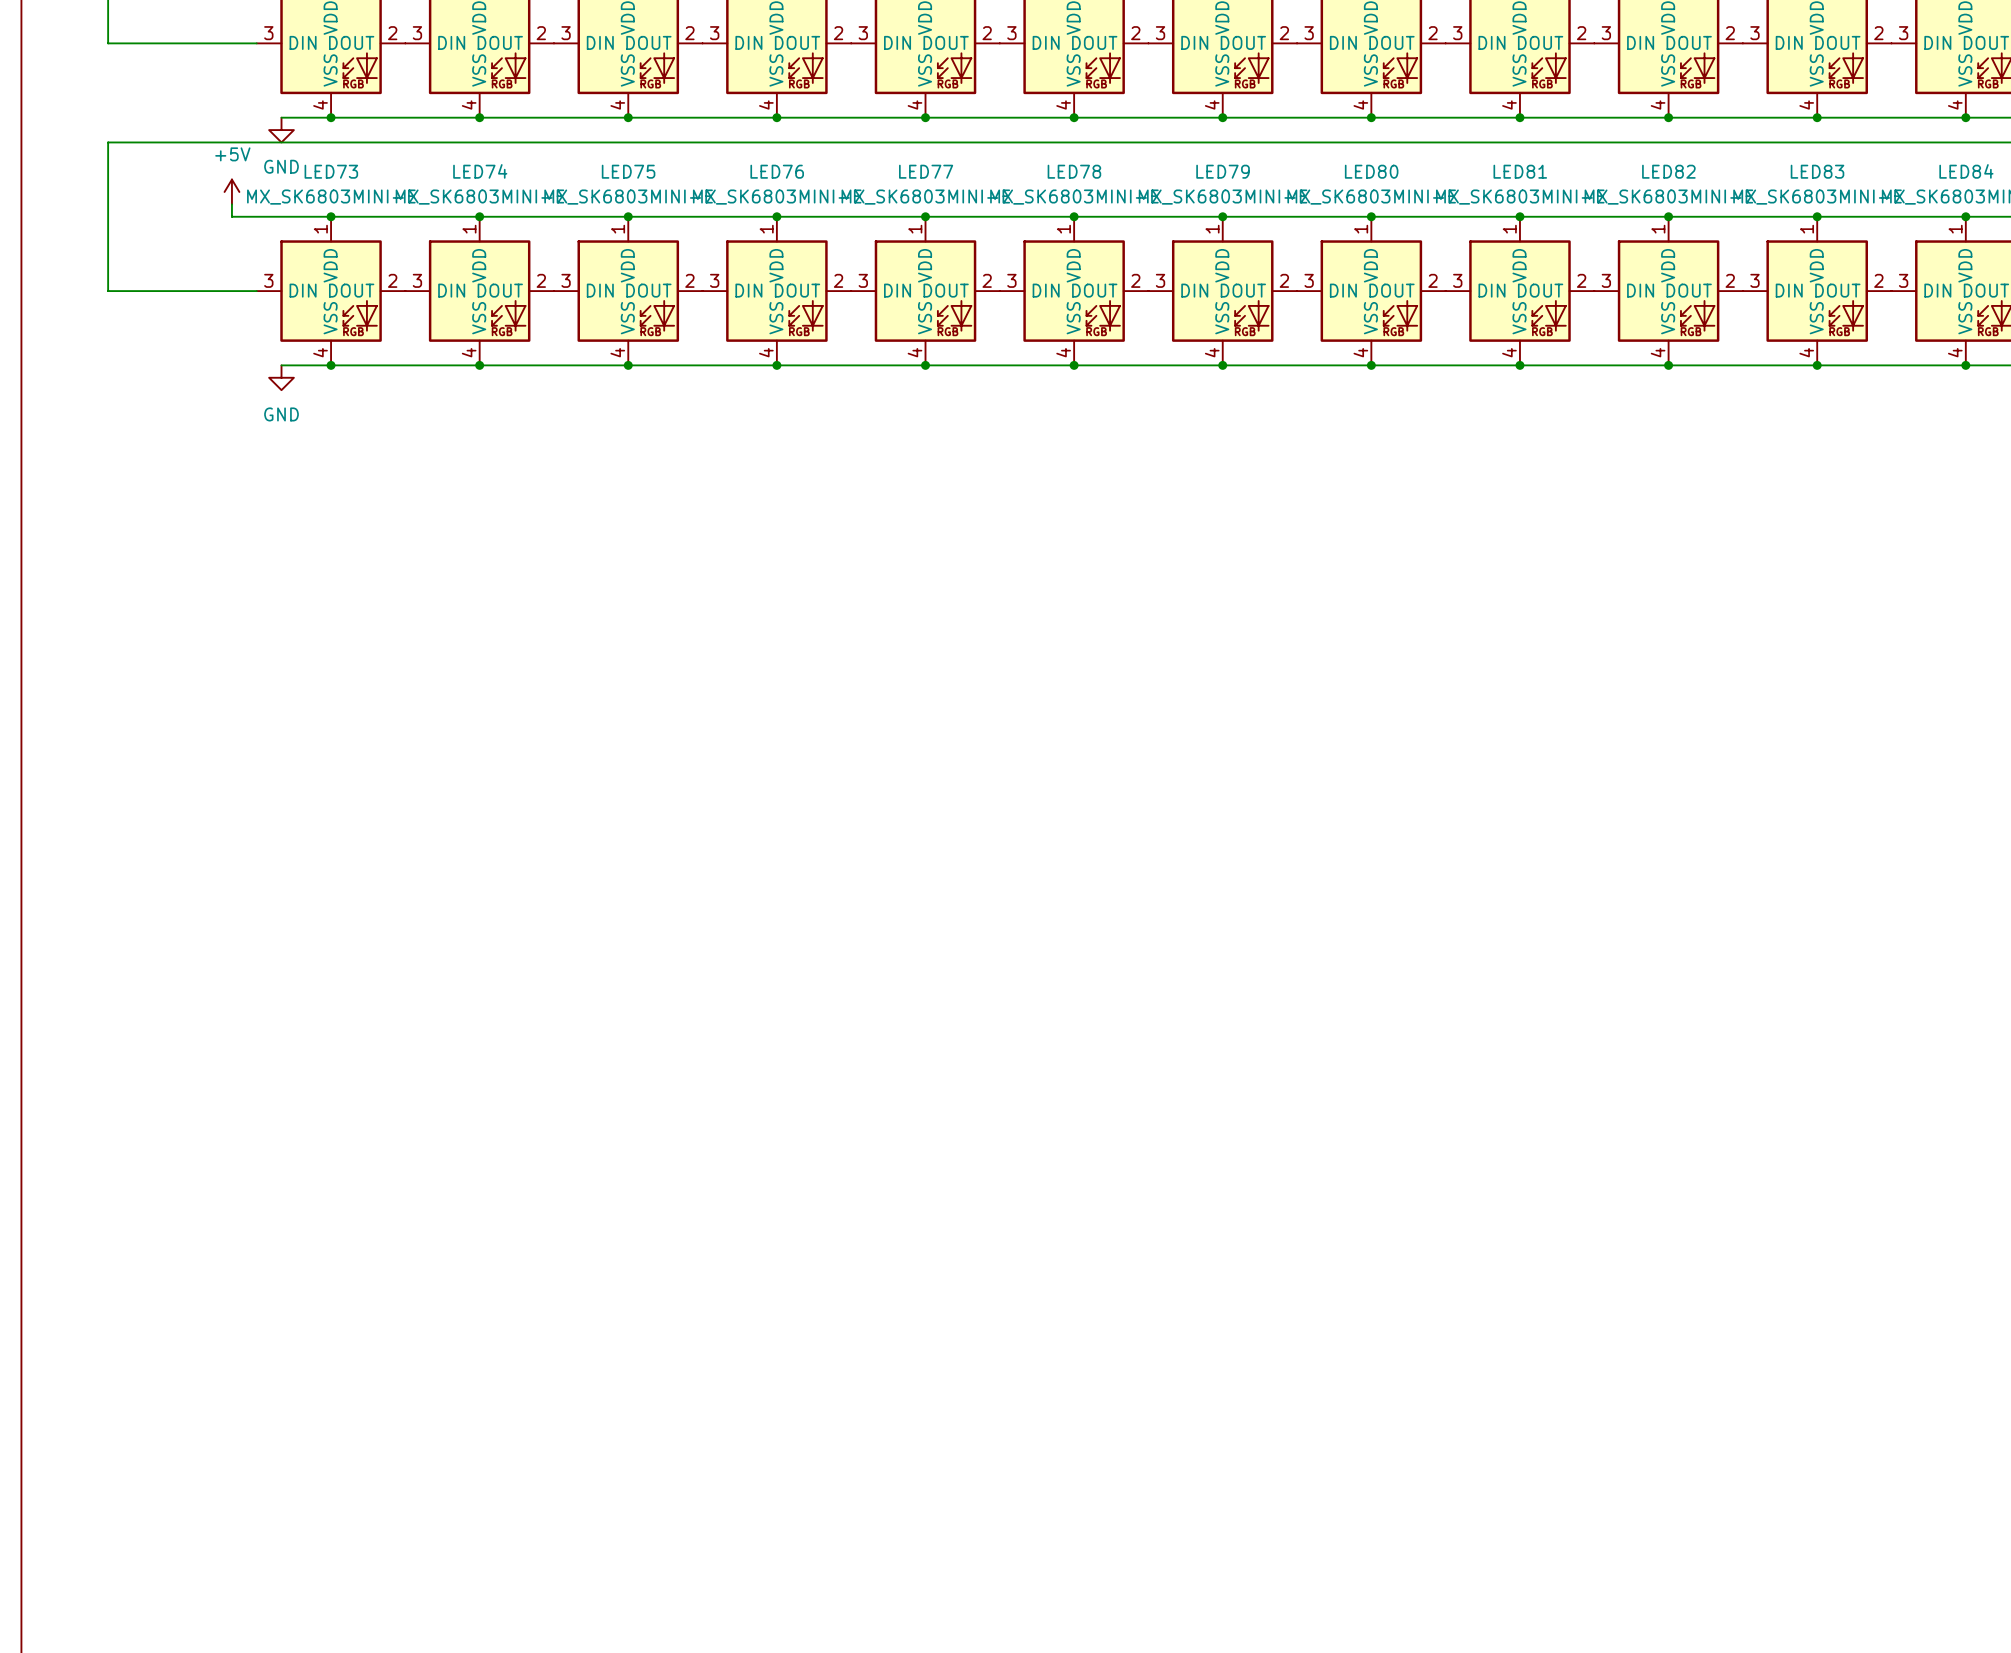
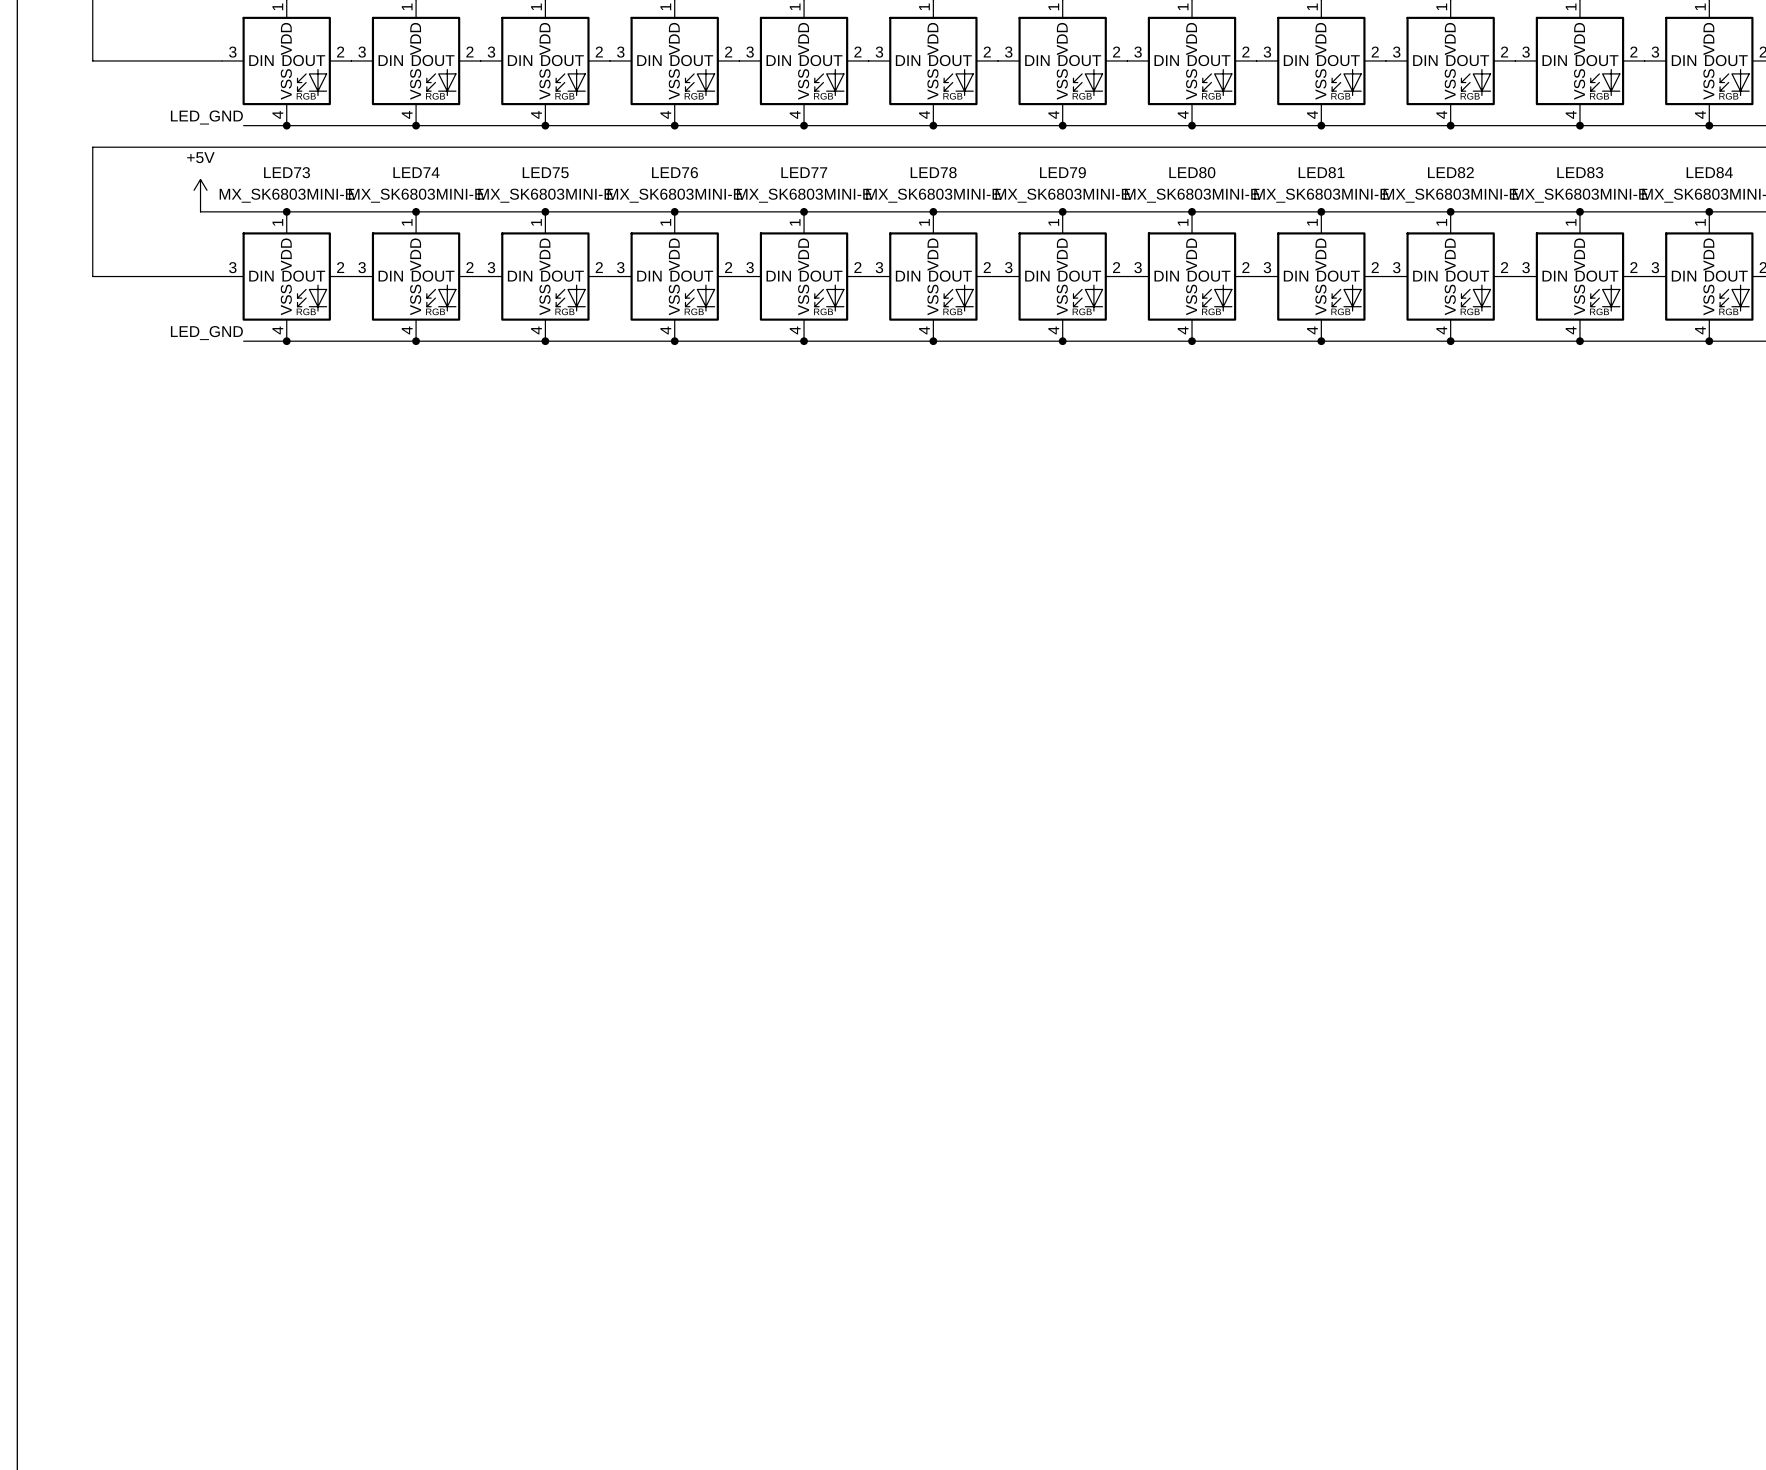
label: none -> LED_GND (206, 117)
power symbol: GND (281, 130) -> none
label: none -> LED_GND (206, 333)
power symbol: GND (281, 377) -> none

